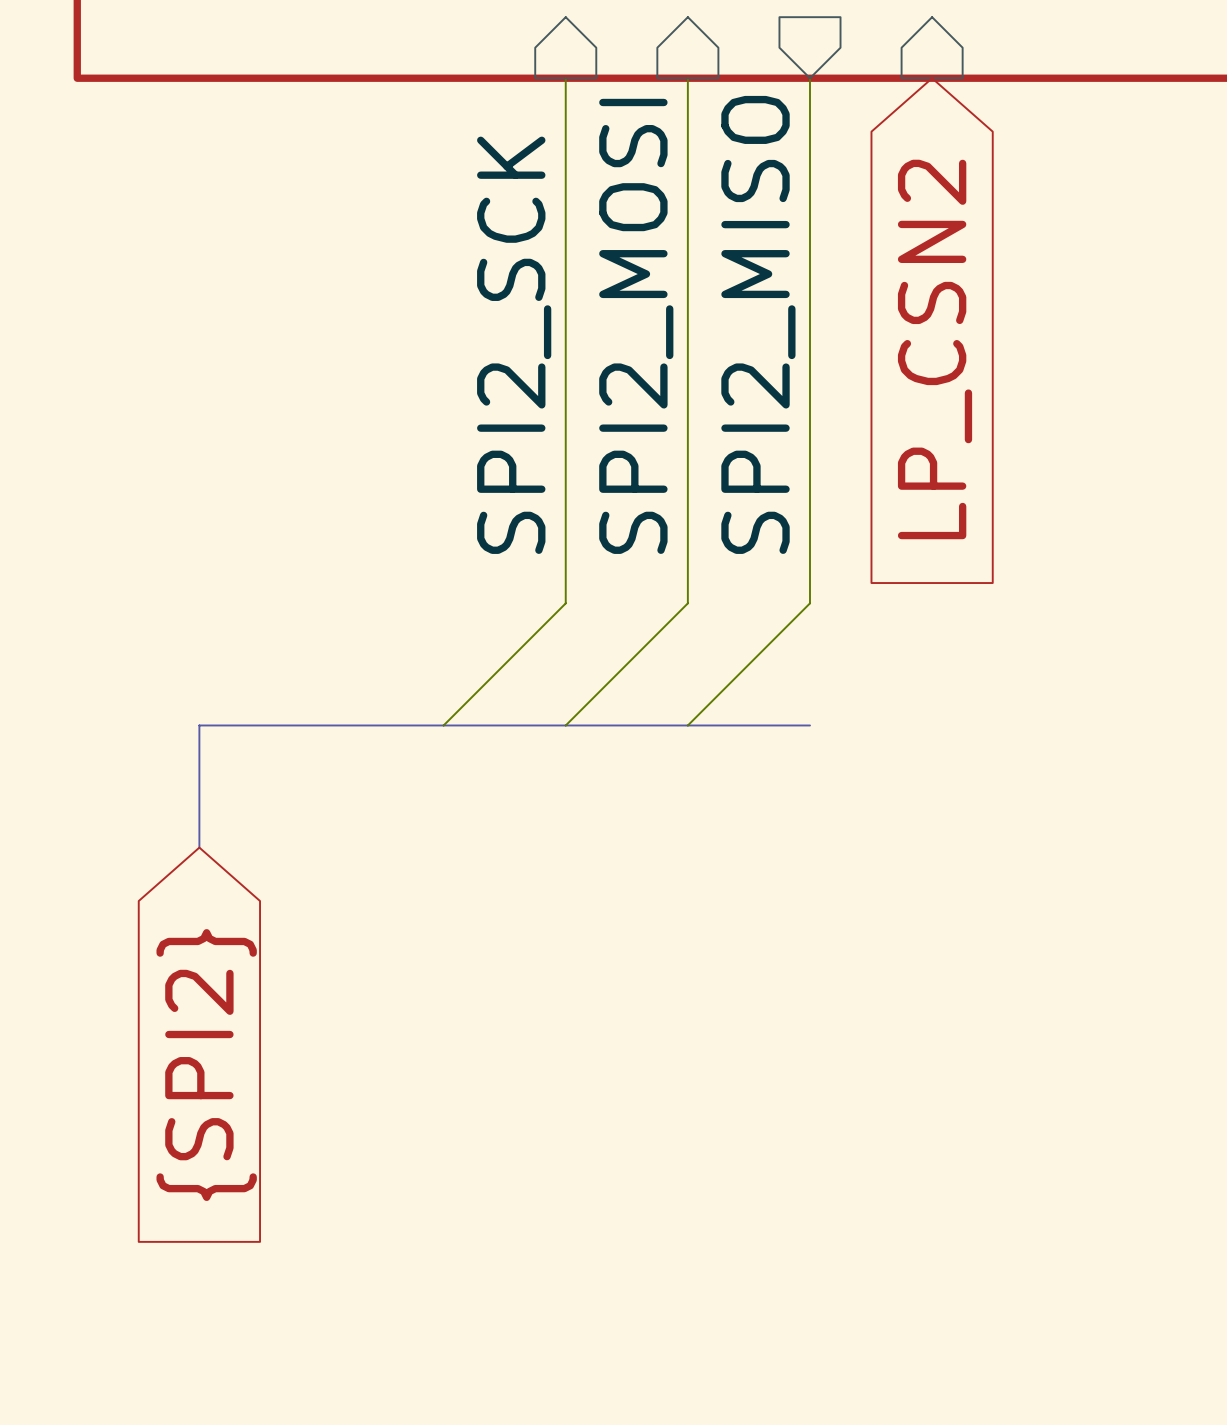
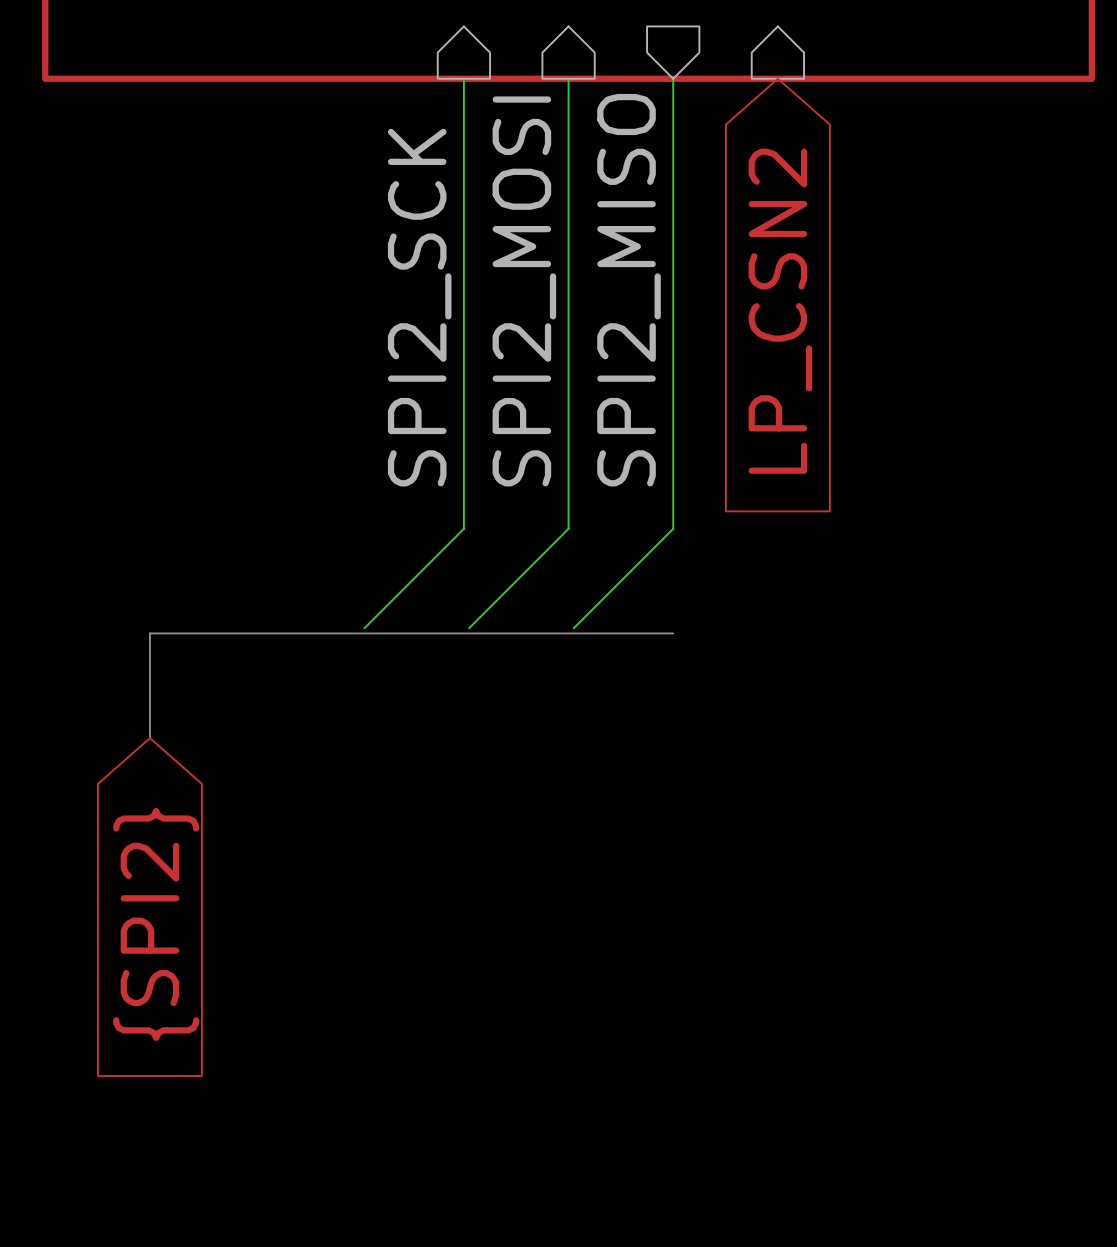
wire: (449, 719) (443, 725) -> none
wire: (571, 719) (565, 725) -> none
wire: (693, 719) (687, 725) -> none

